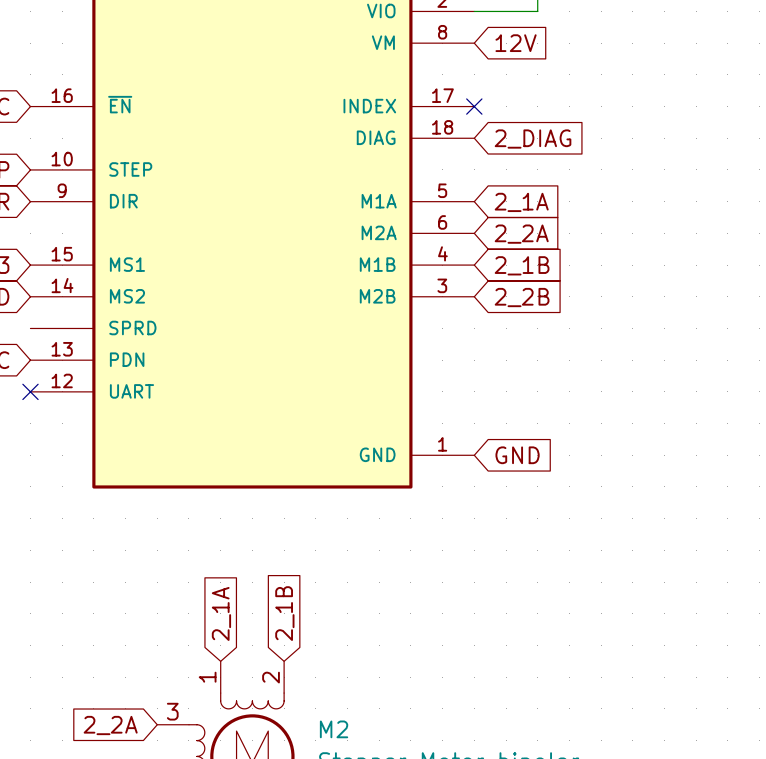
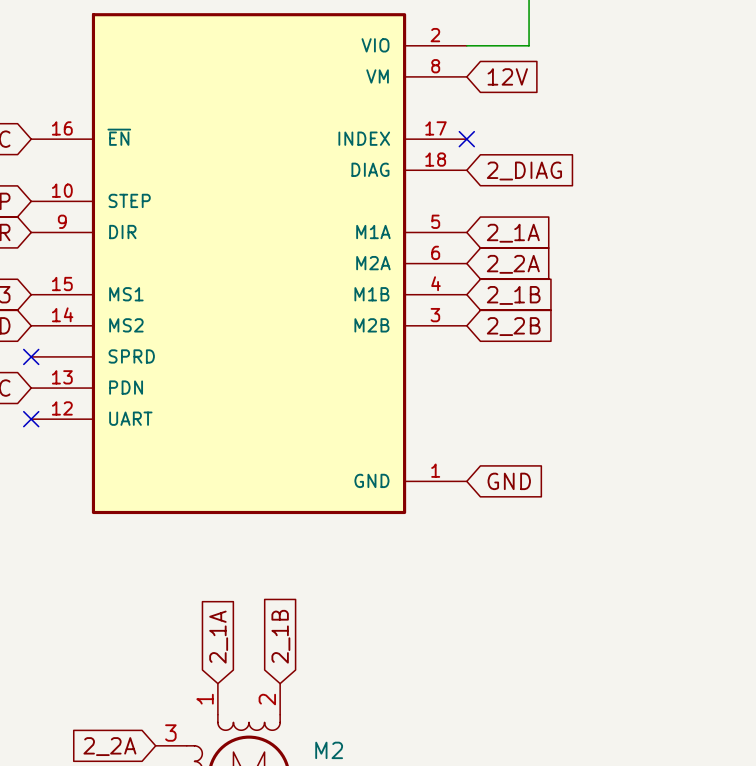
no-connect mark: none -> (31, 356)

